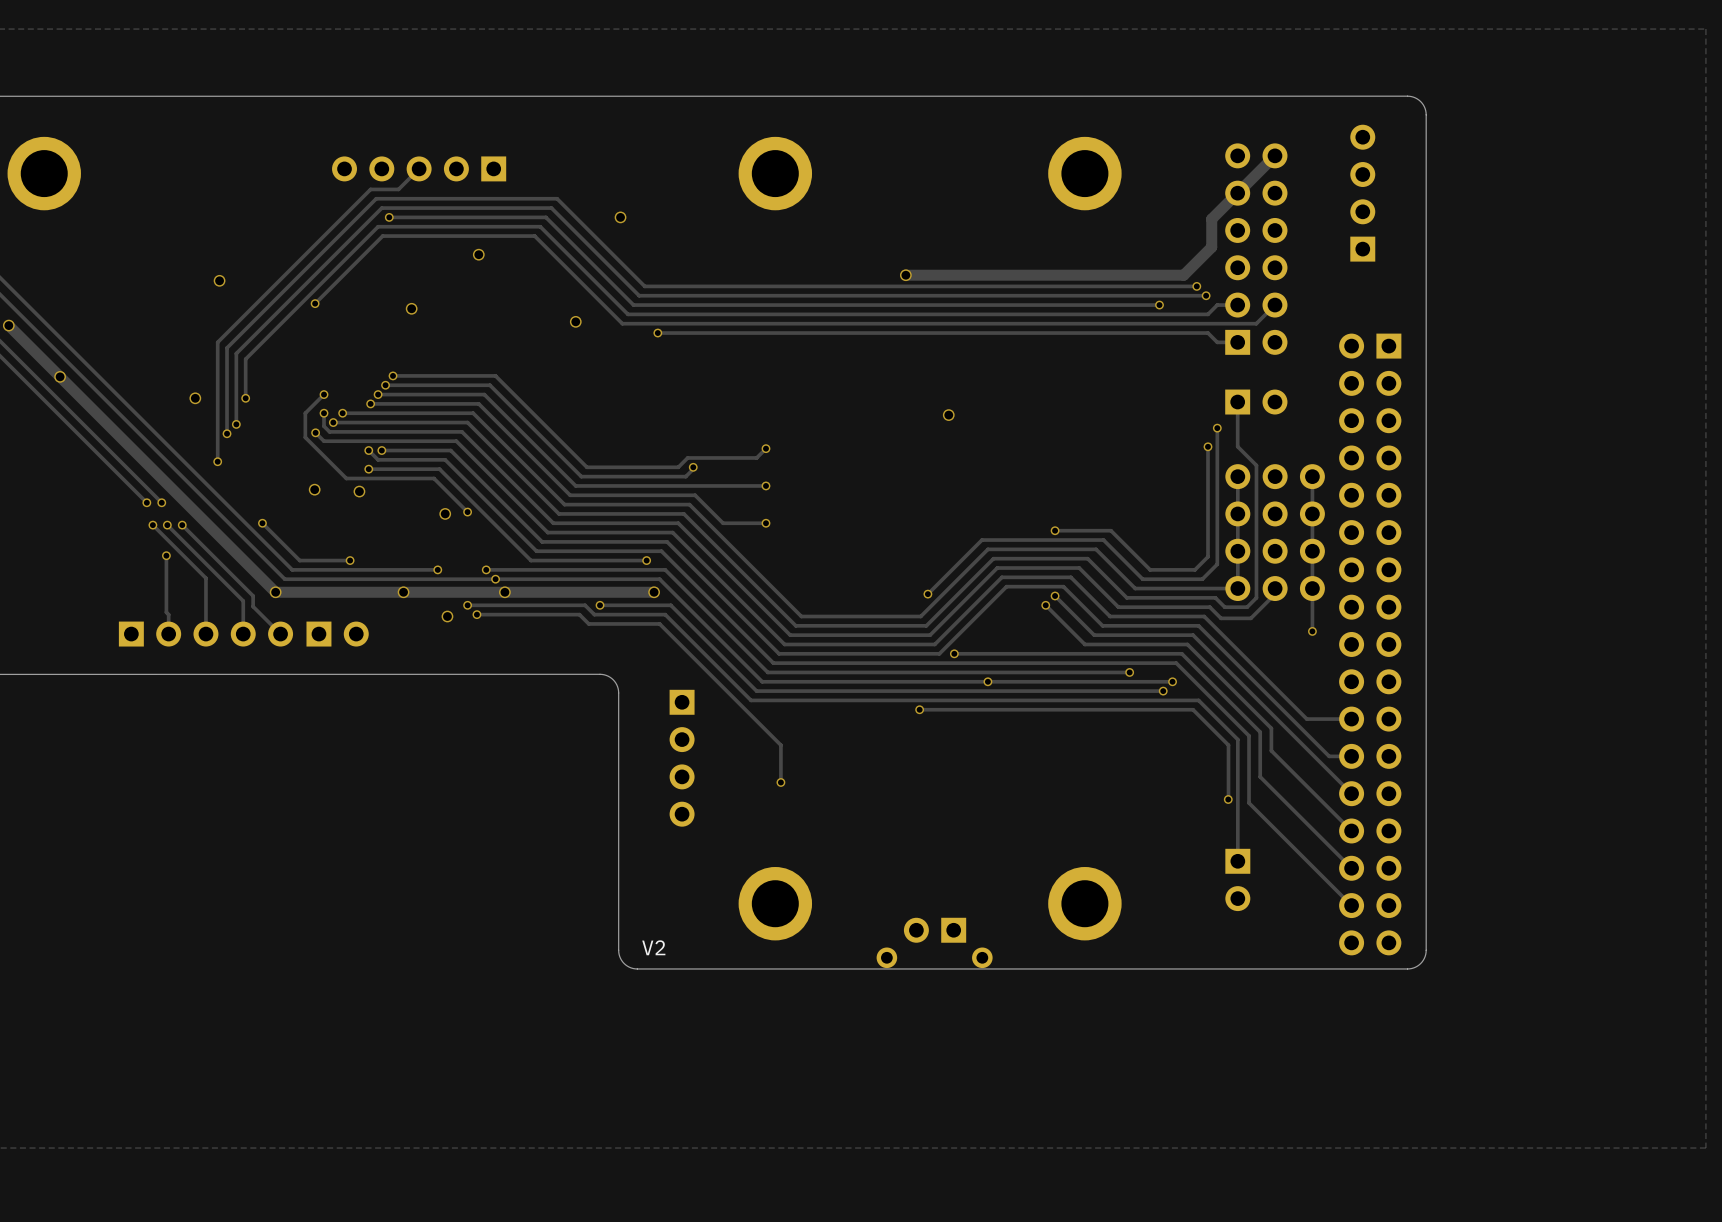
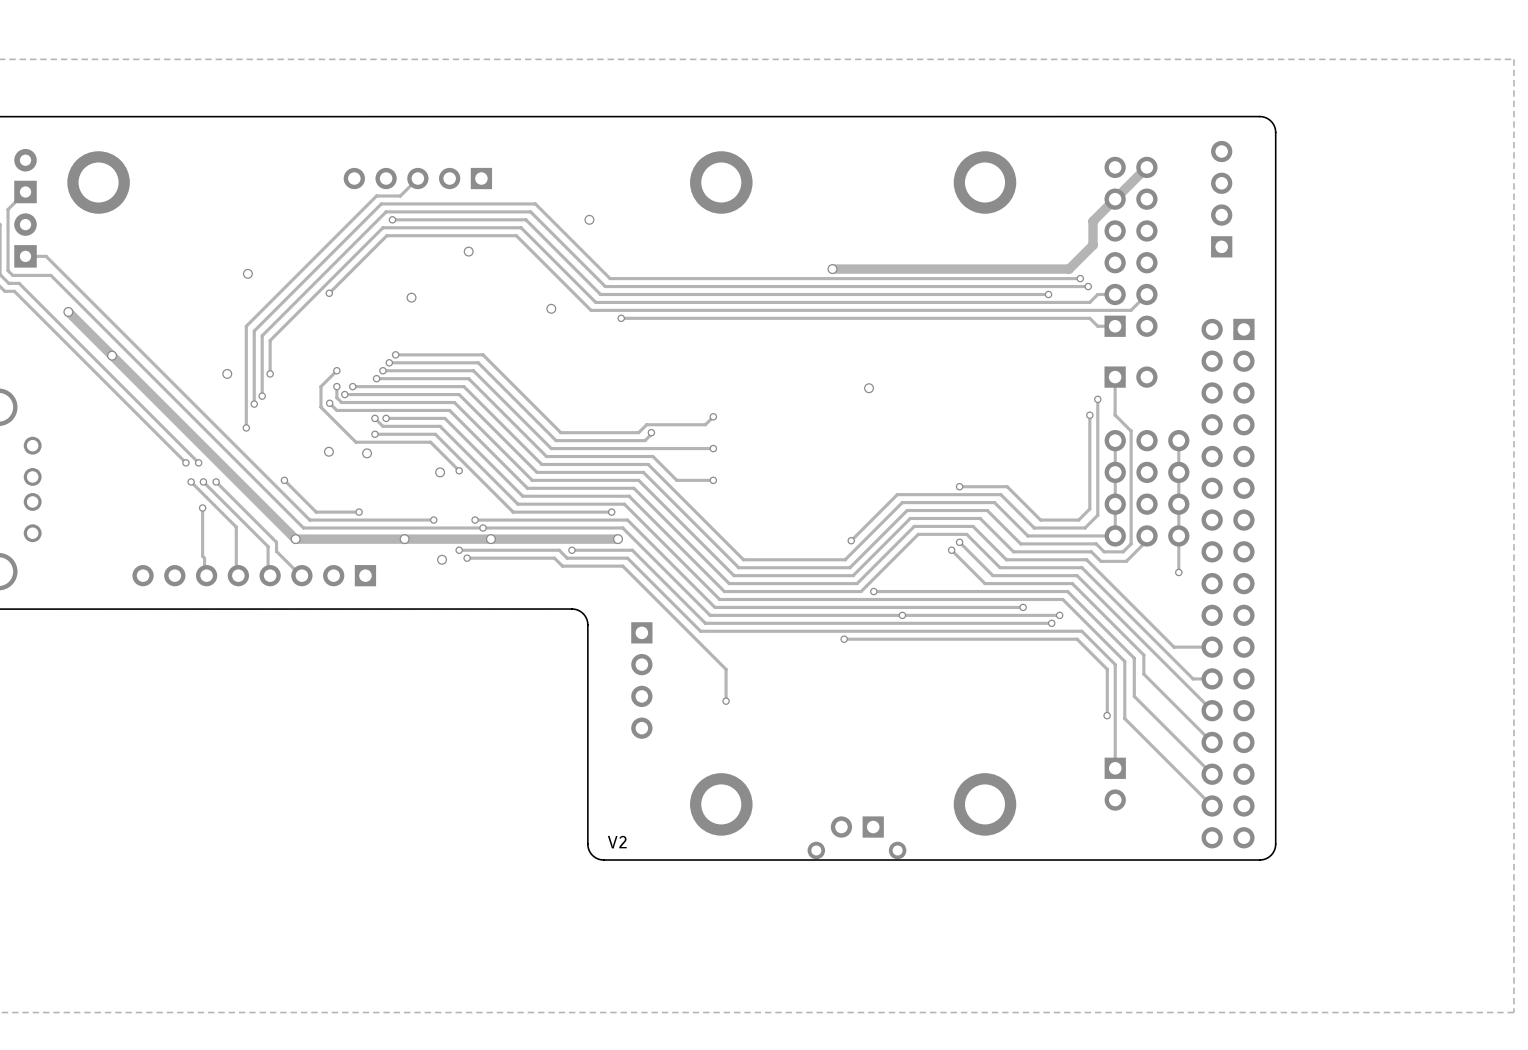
part: (205, 634) -> none
part: (337, 634) -> none
part: none -> (254, 575)

